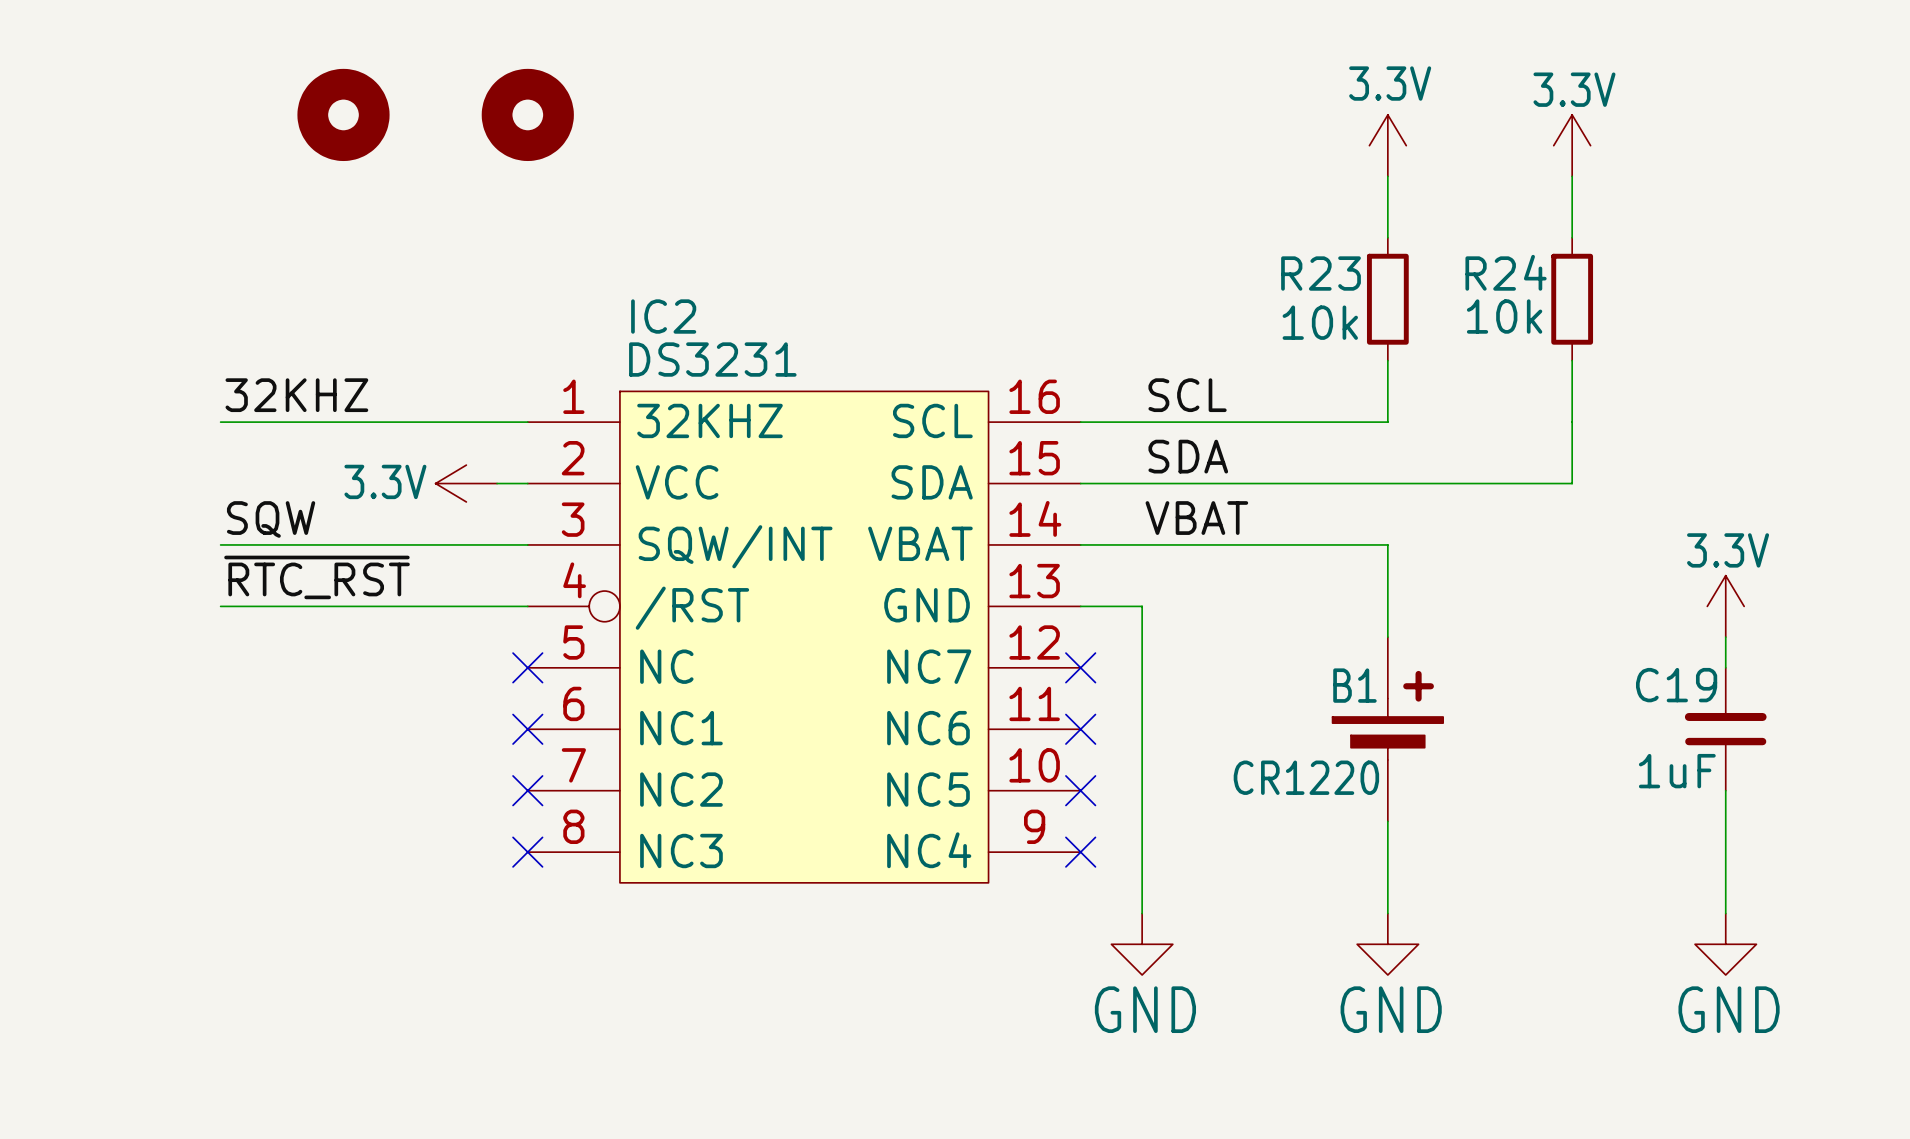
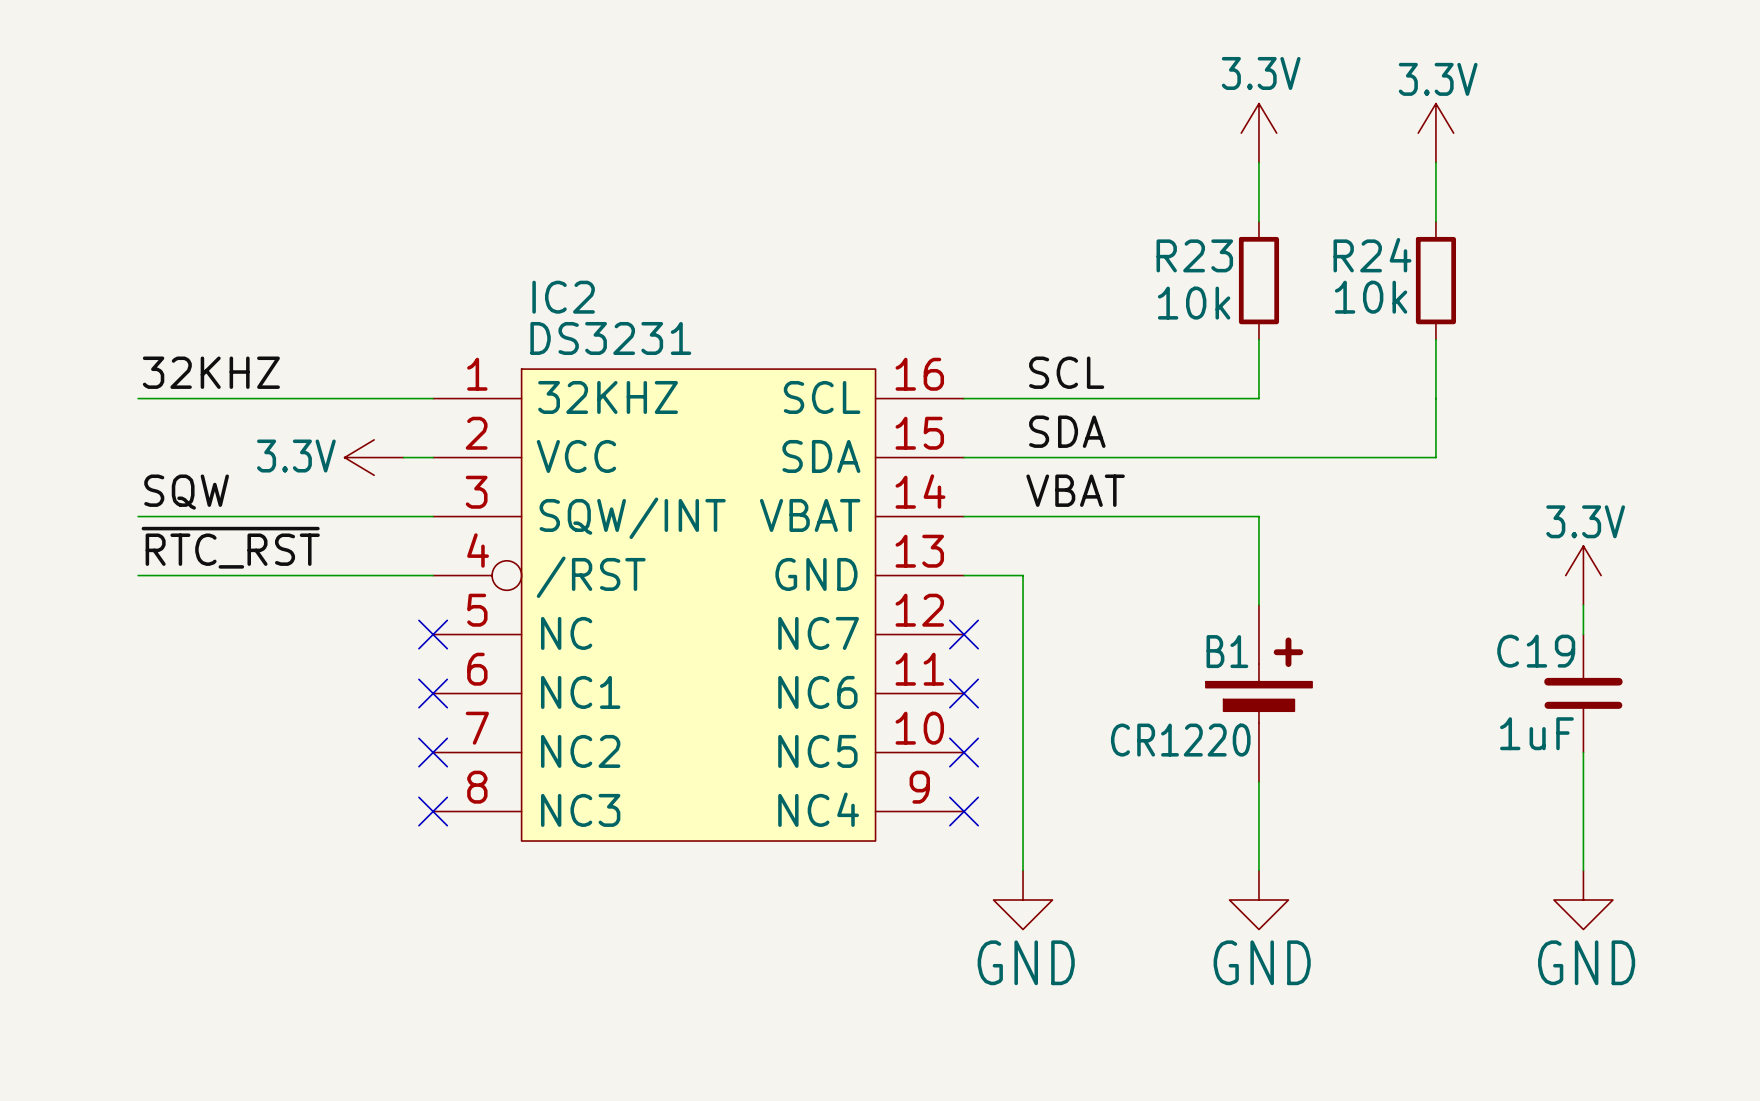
part: (343, 114) -> none
part: (527, 114) -> none

